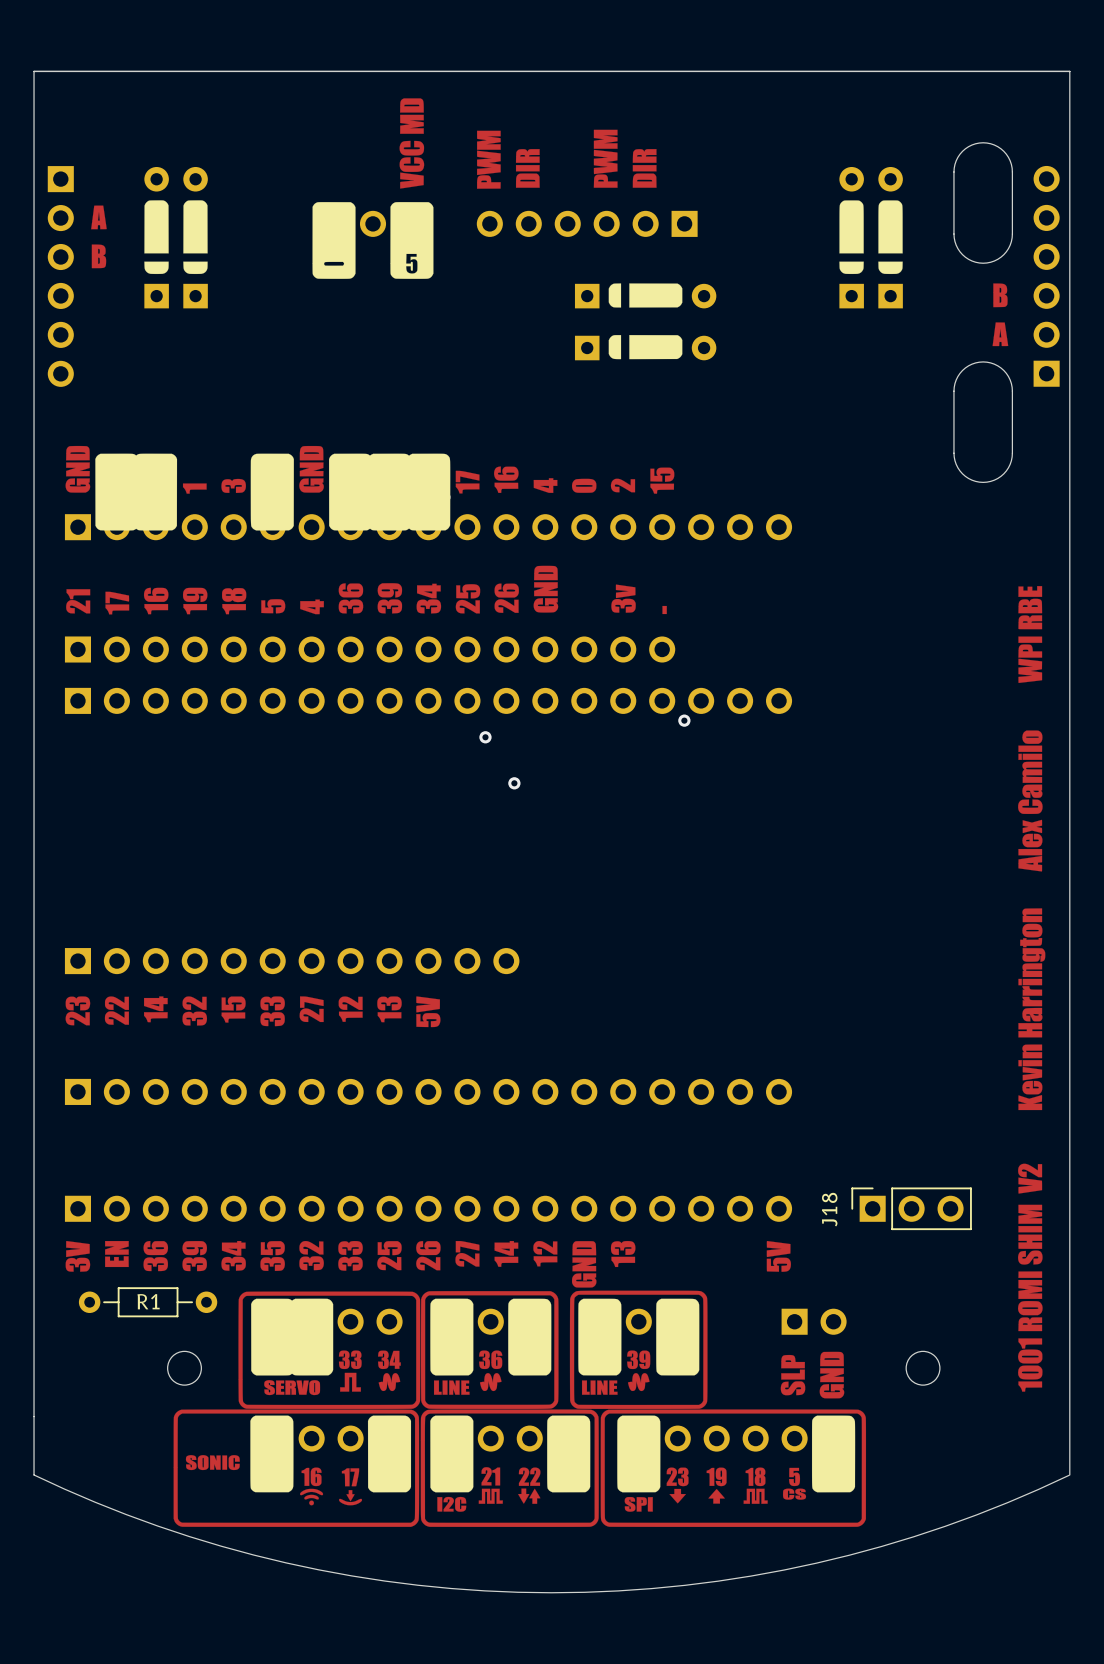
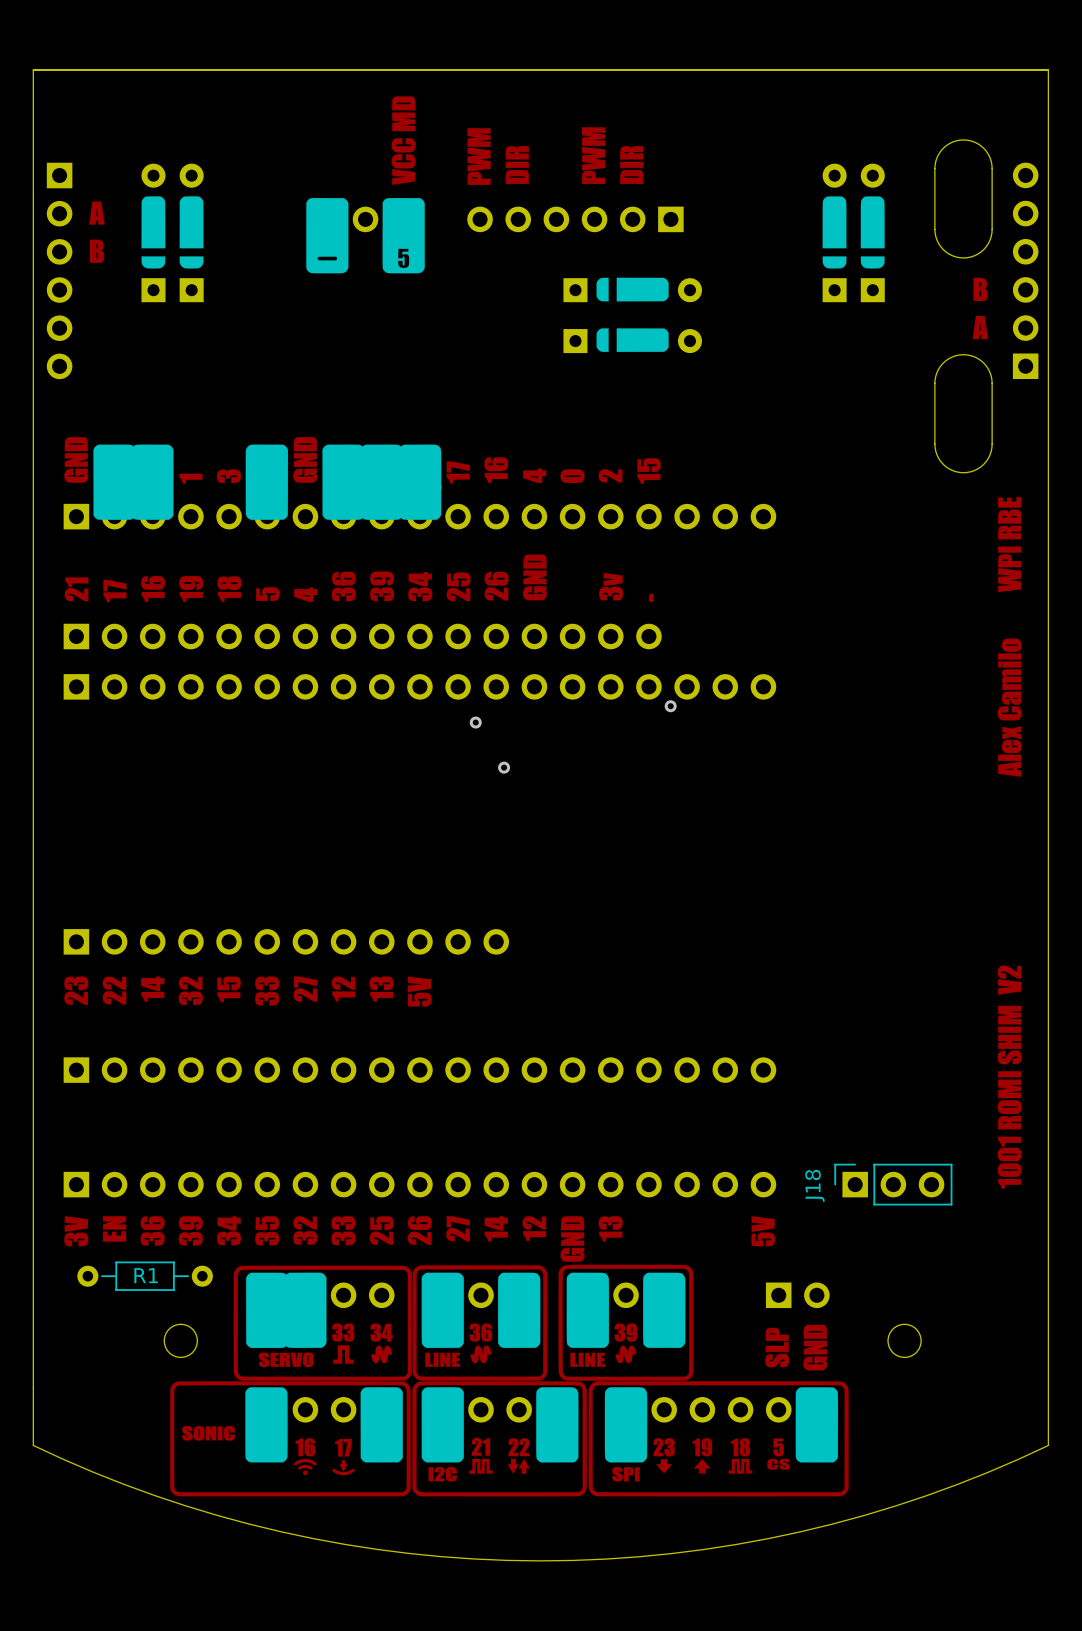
drawing shape: [65, 98, 1046, 1528] -> [64, 96, 1022, 1497]

